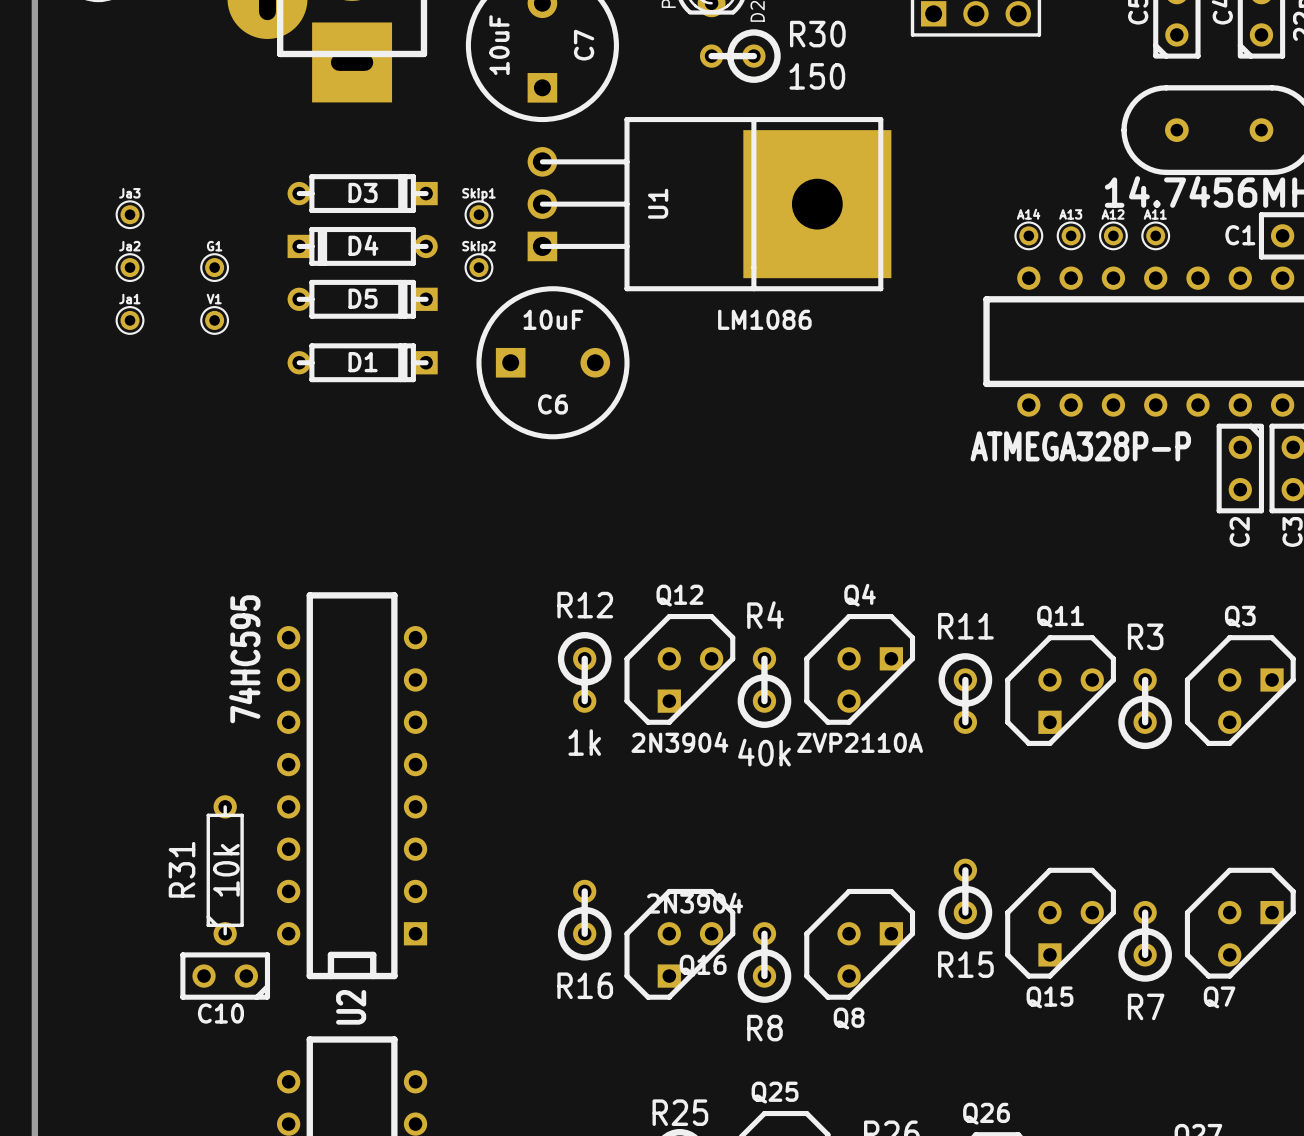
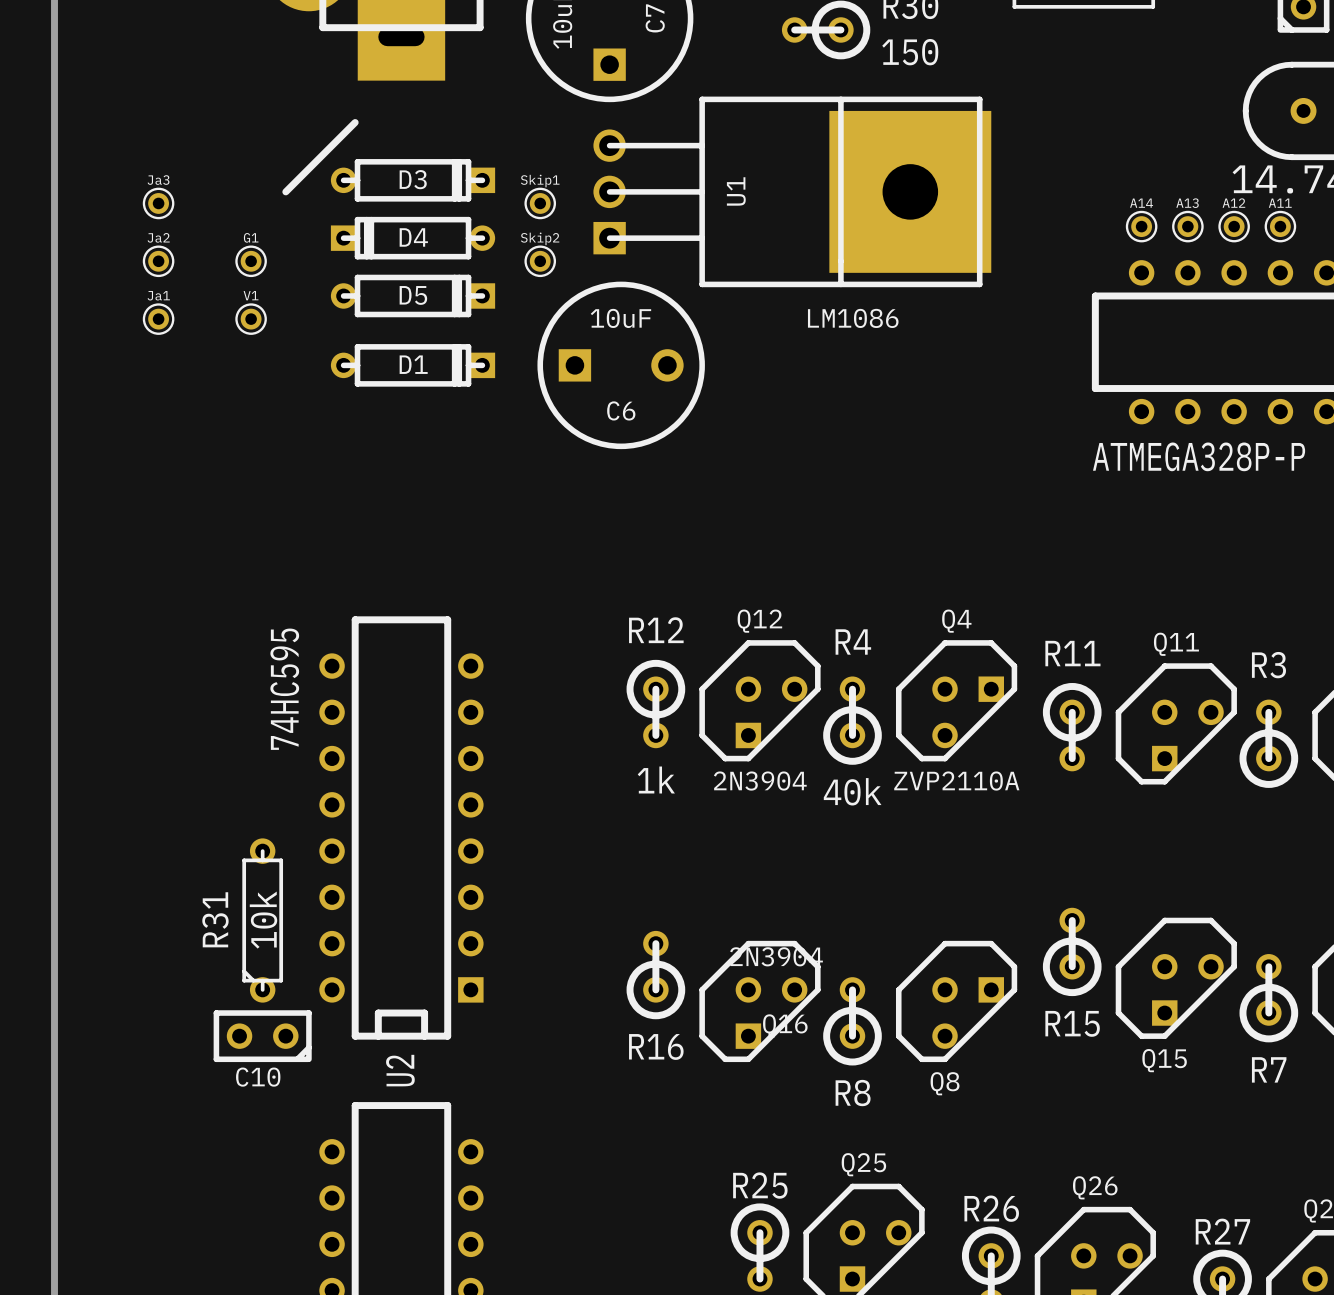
line: none -> (355, 122) (285, 191)

